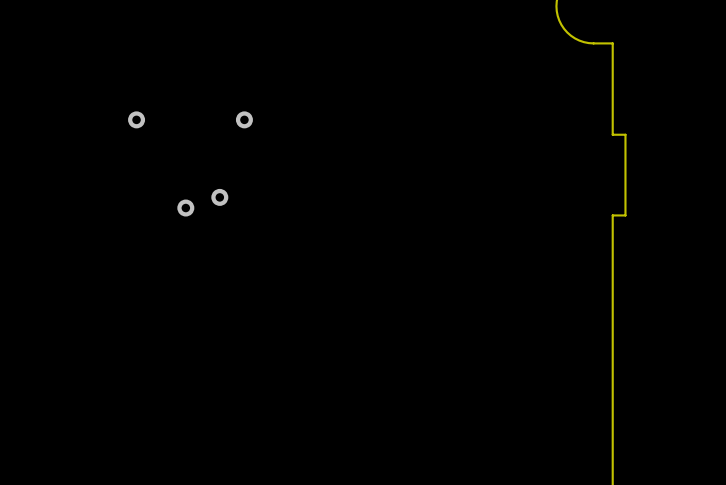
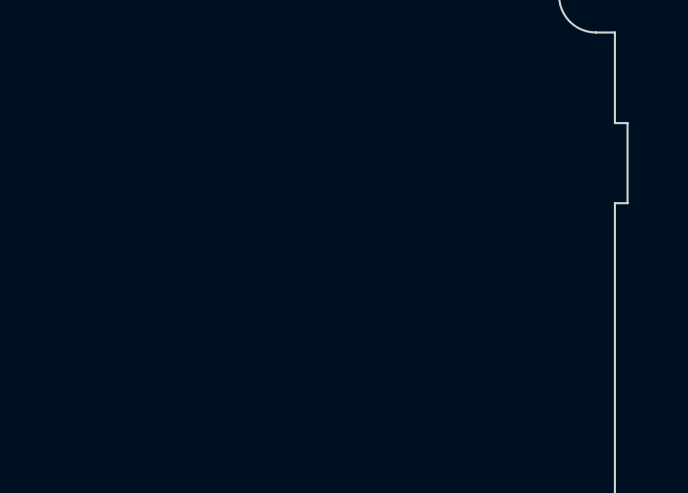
via: (136, 119) -> none
via: (244, 119) -> none
via: (219, 197) -> none
via: (185, 208) -> none

